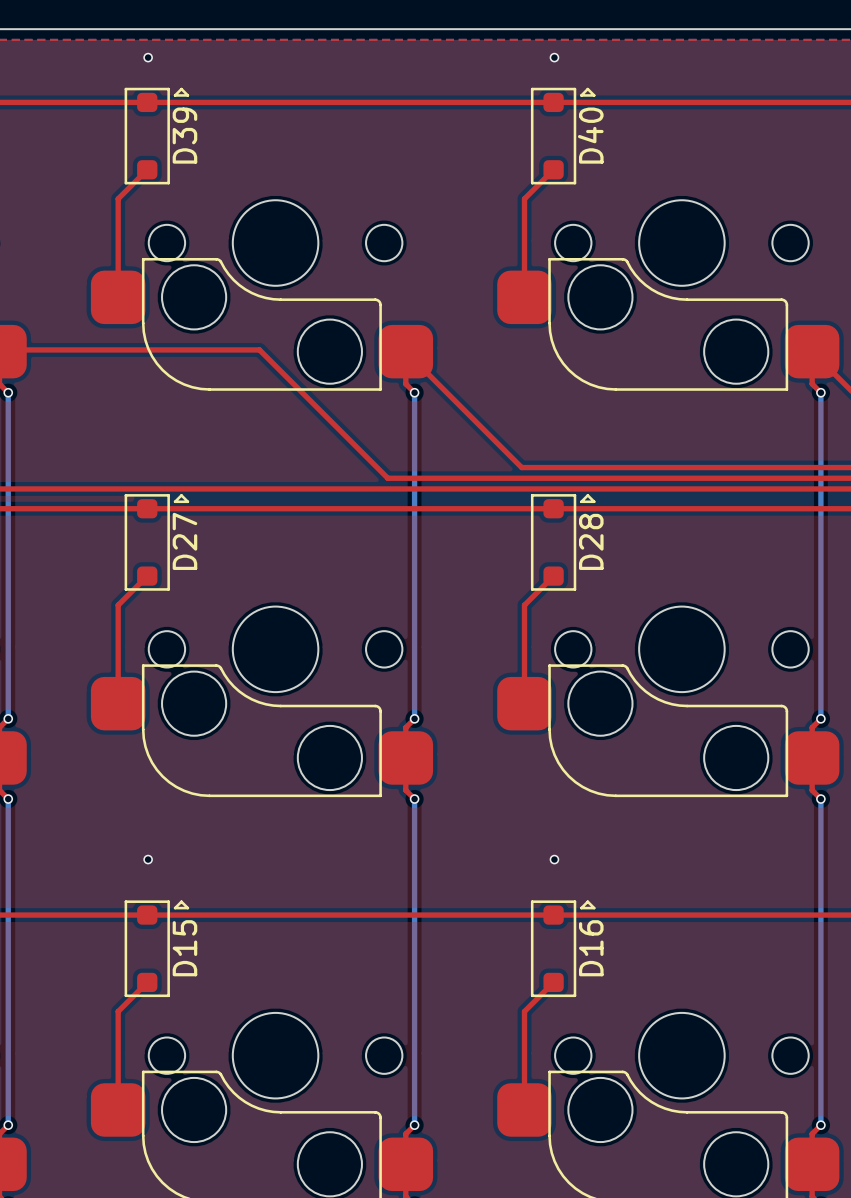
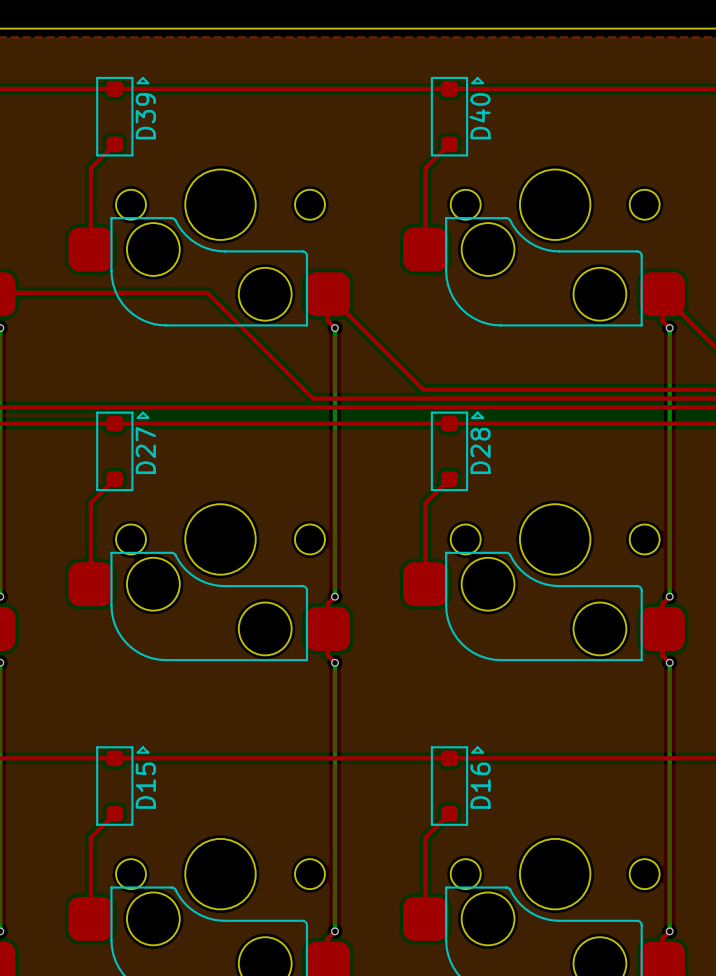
via: (148, 57) -> none
via: (554, 57) -> none
via: (148, 859) -> none
via: (554, 859) -> none

